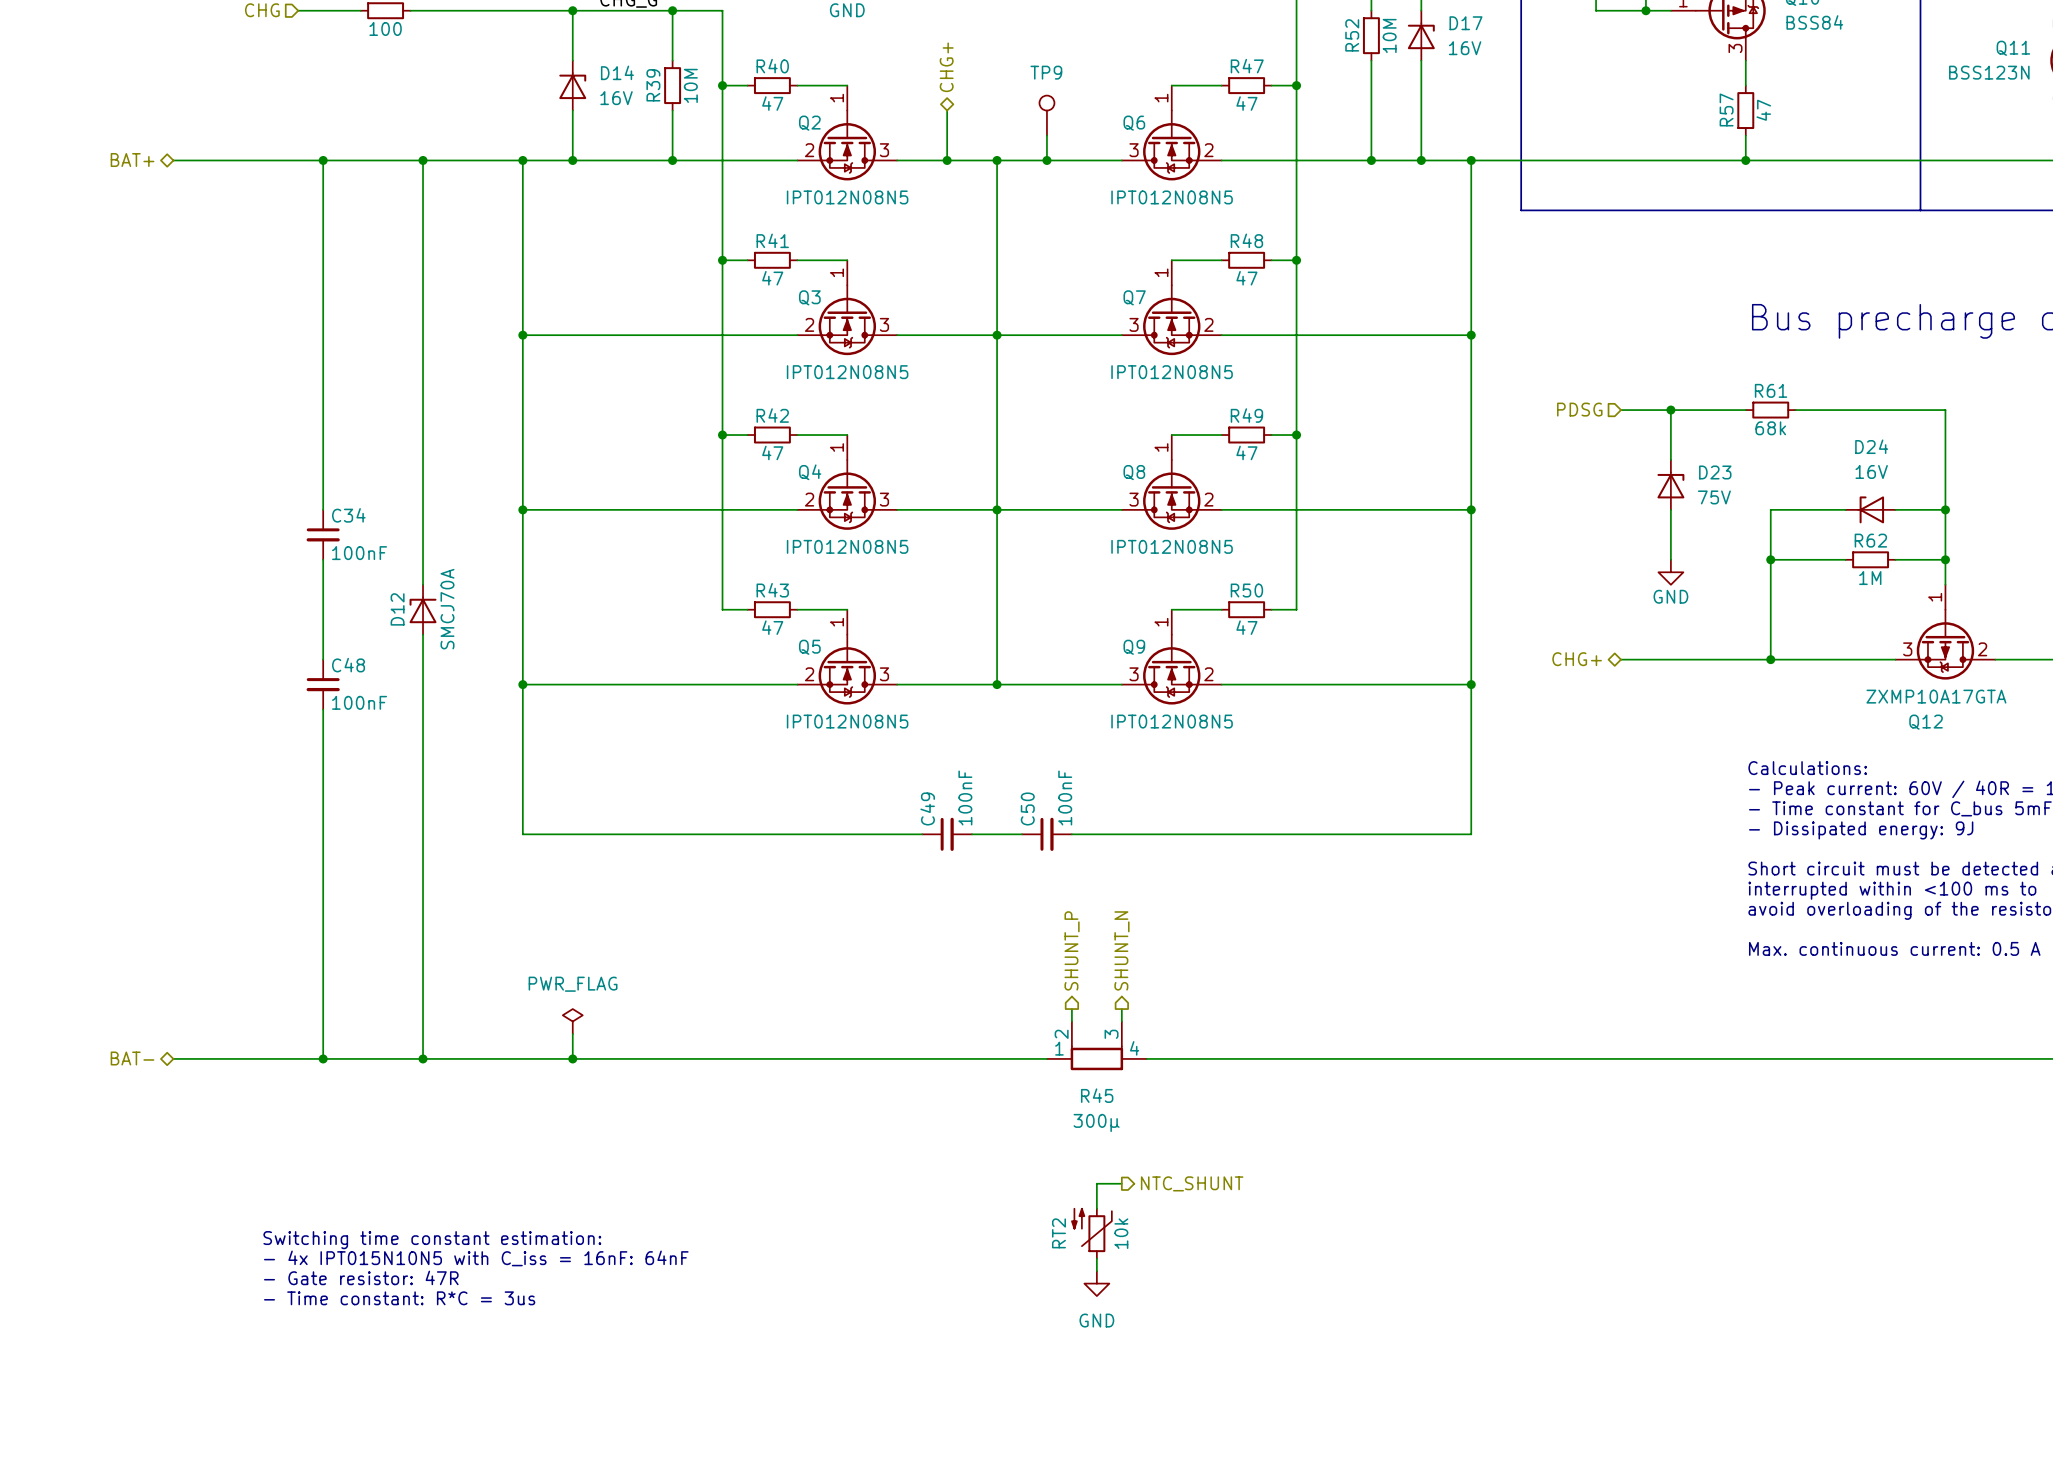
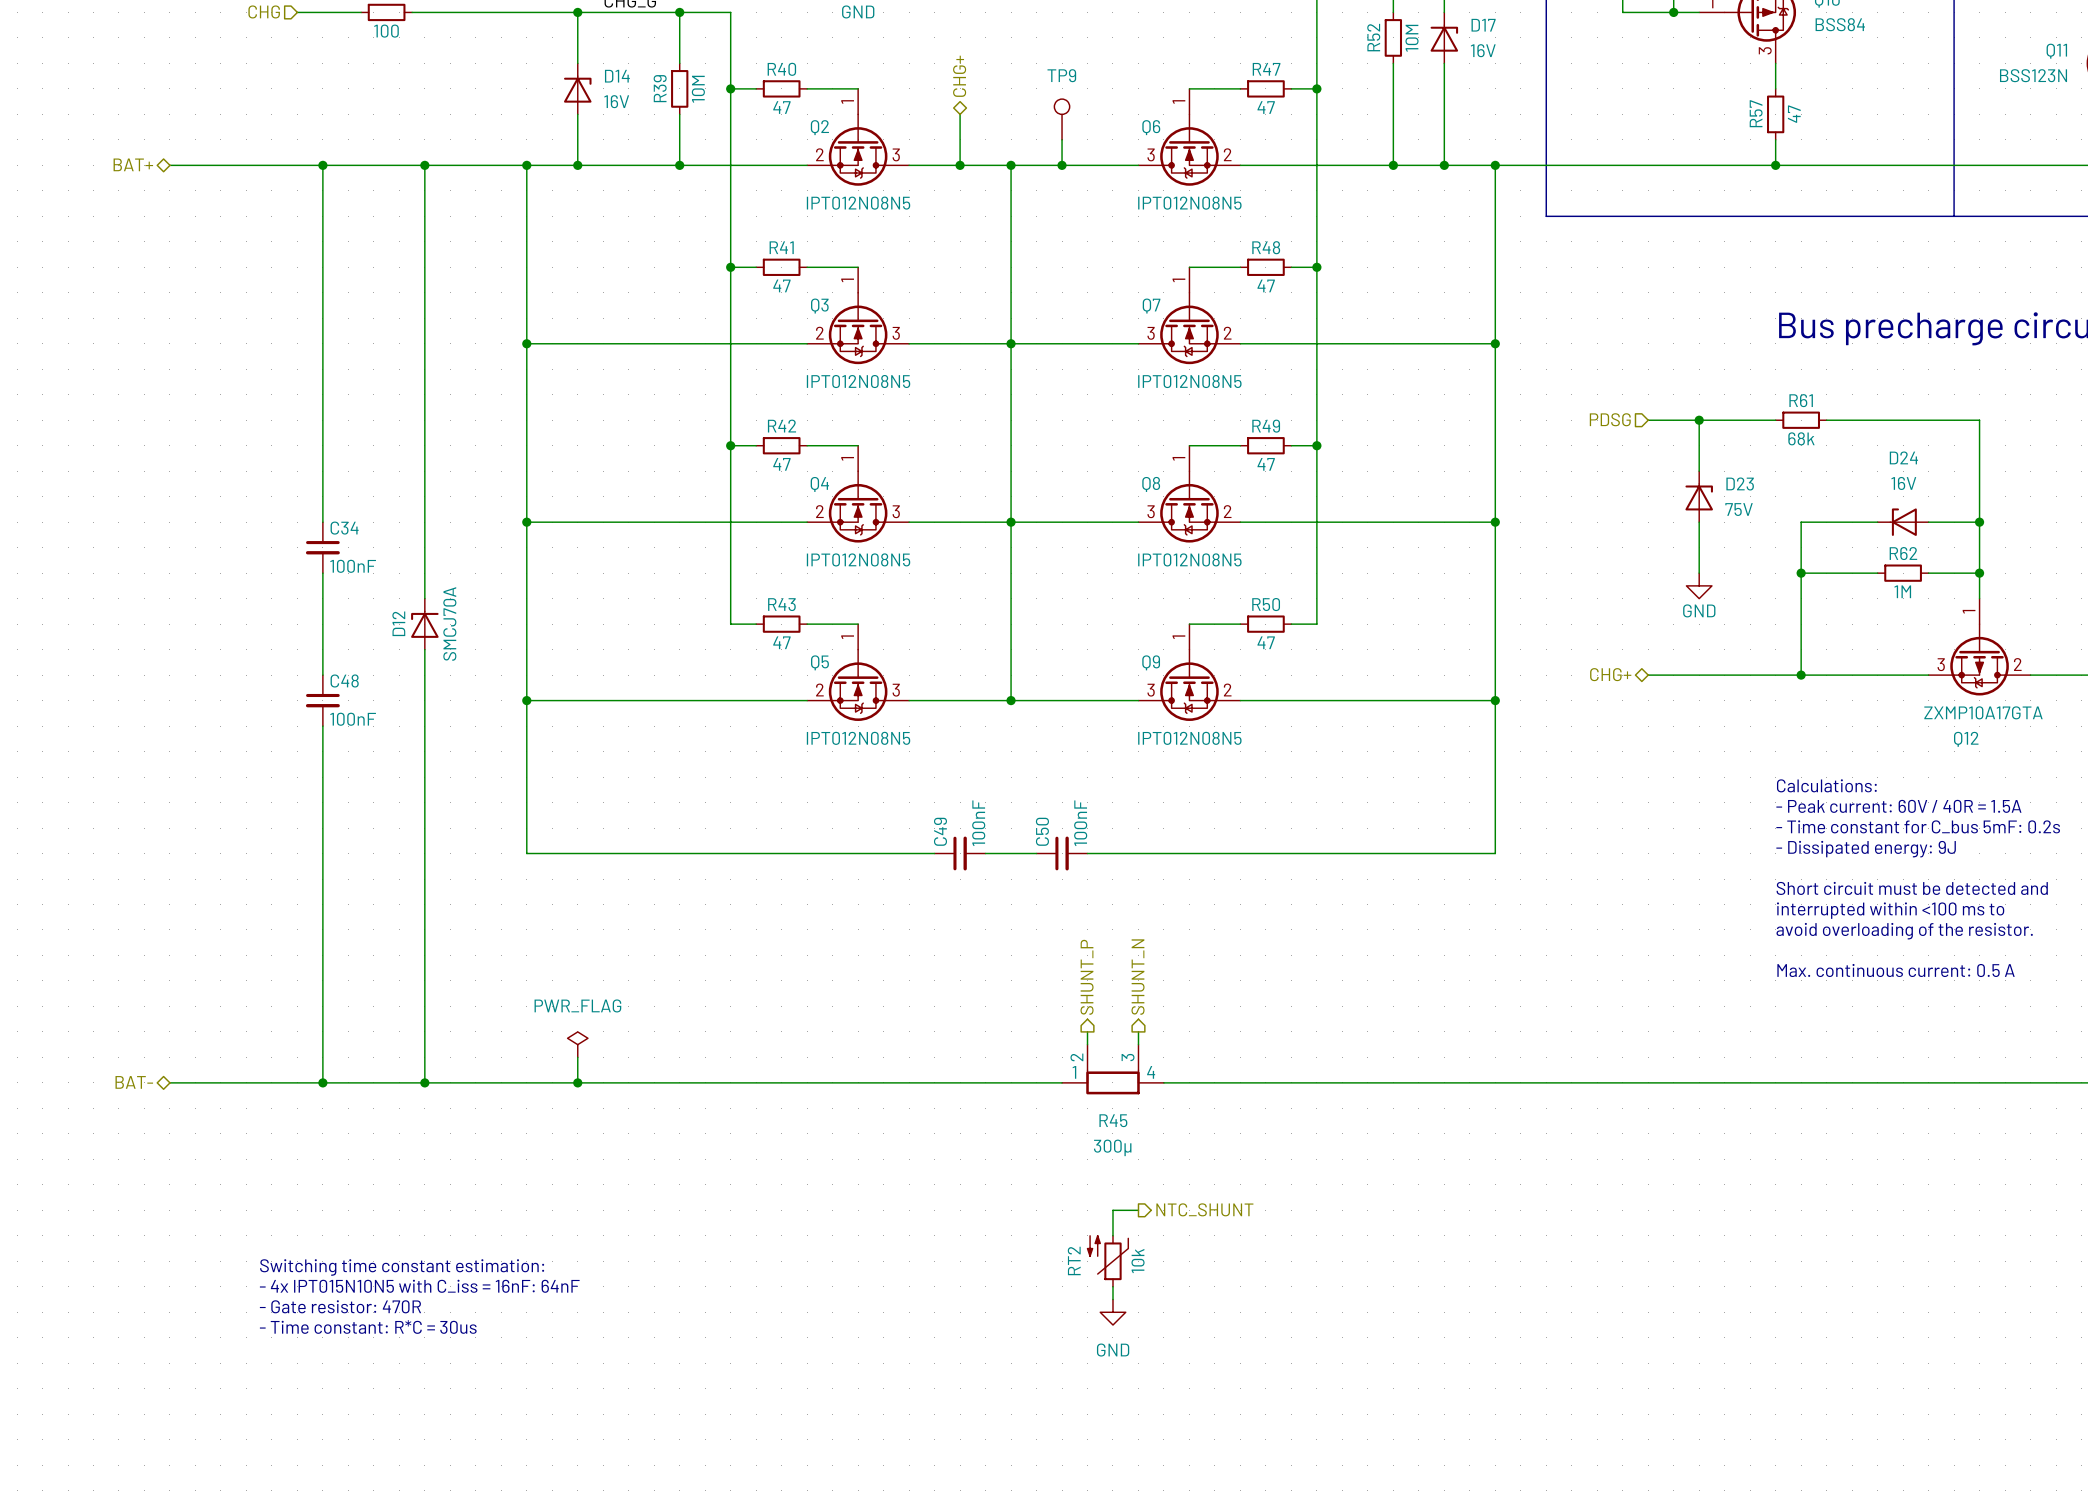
text: - Gate resistor: 47R (361, 1277) -> - Gate resistor: 470R (340, 1306)
text: - Time constant: R*C = 3us (399, 1298) -> - Time constant: R*C = 30us (368, 1326)

